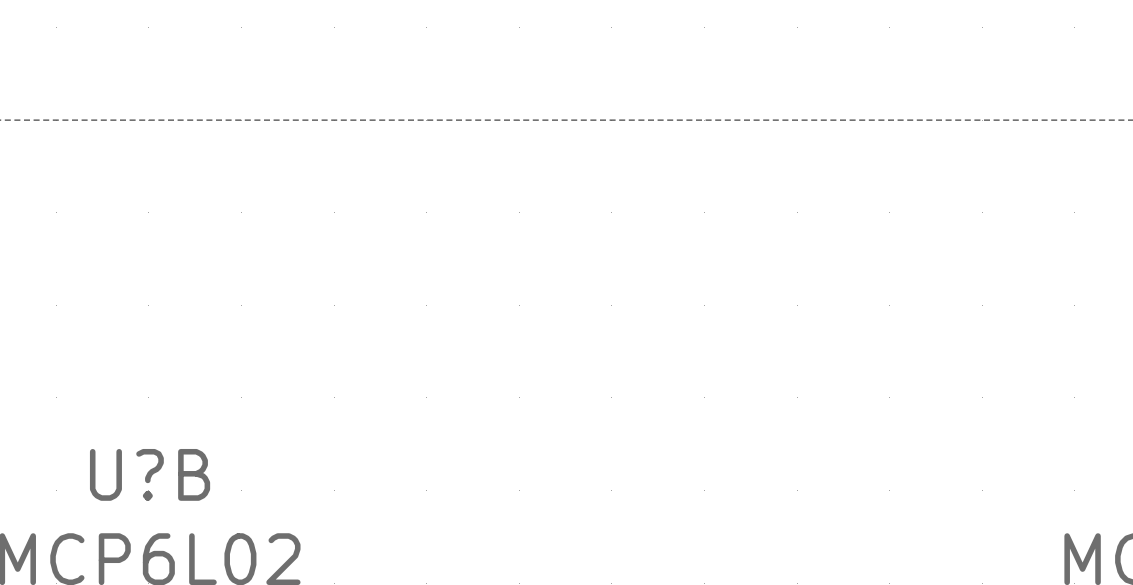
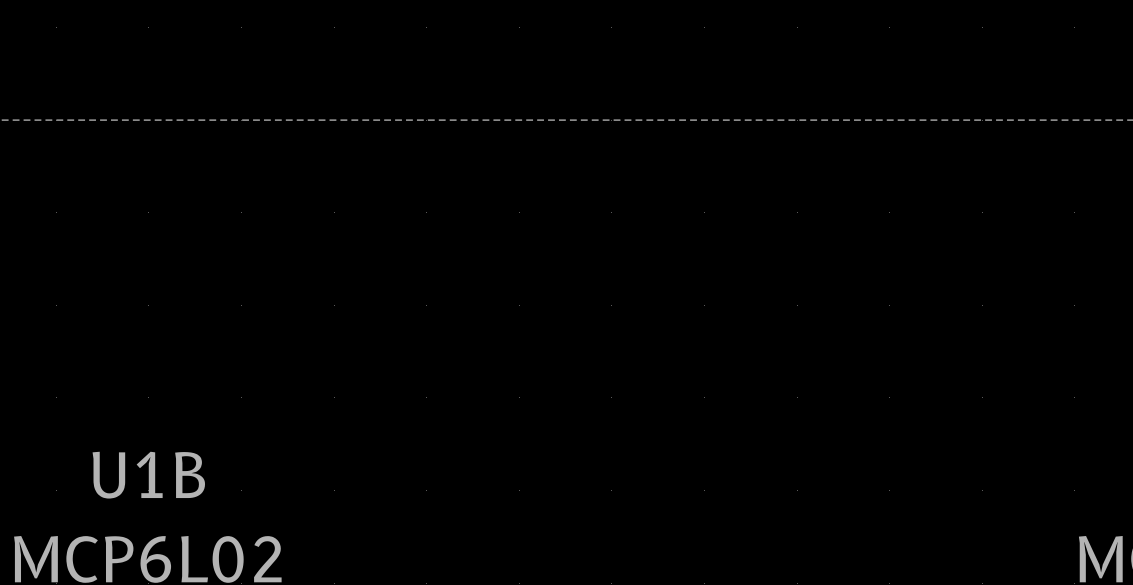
U?B name: U?B (150, 474) -> U1B (148, 475)

